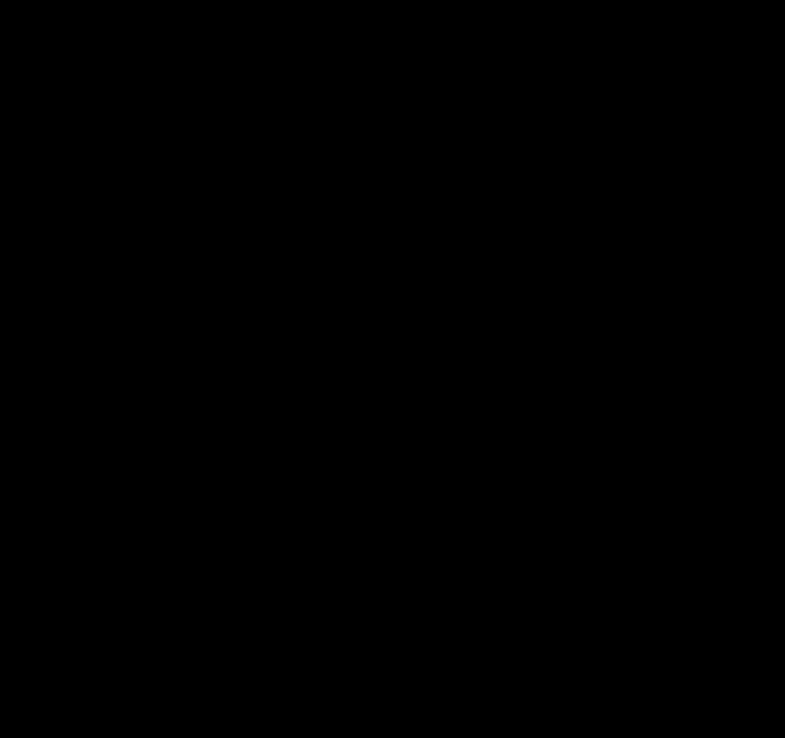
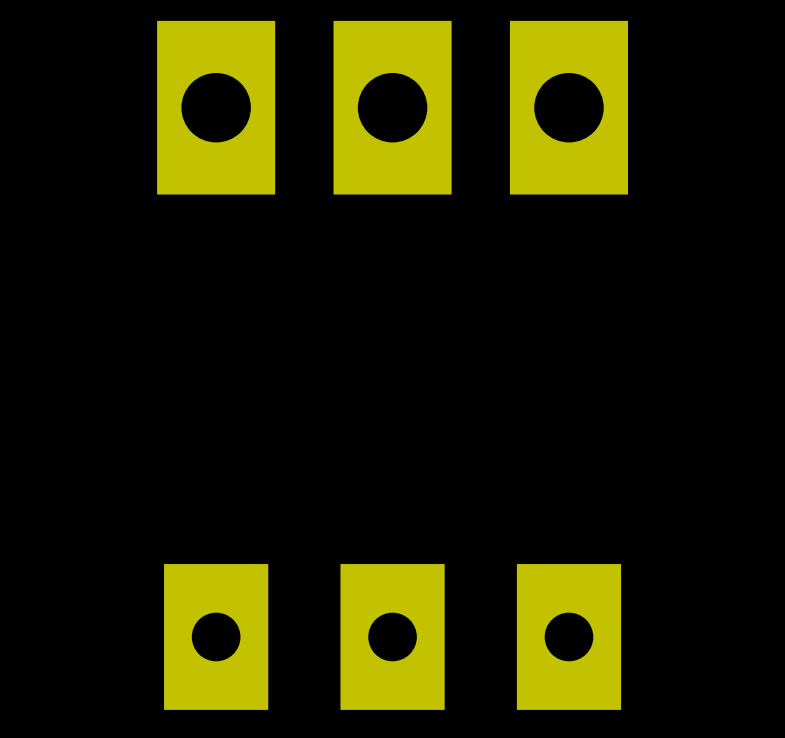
part: none -> (392, 107)
part: none -> (392, 636)

